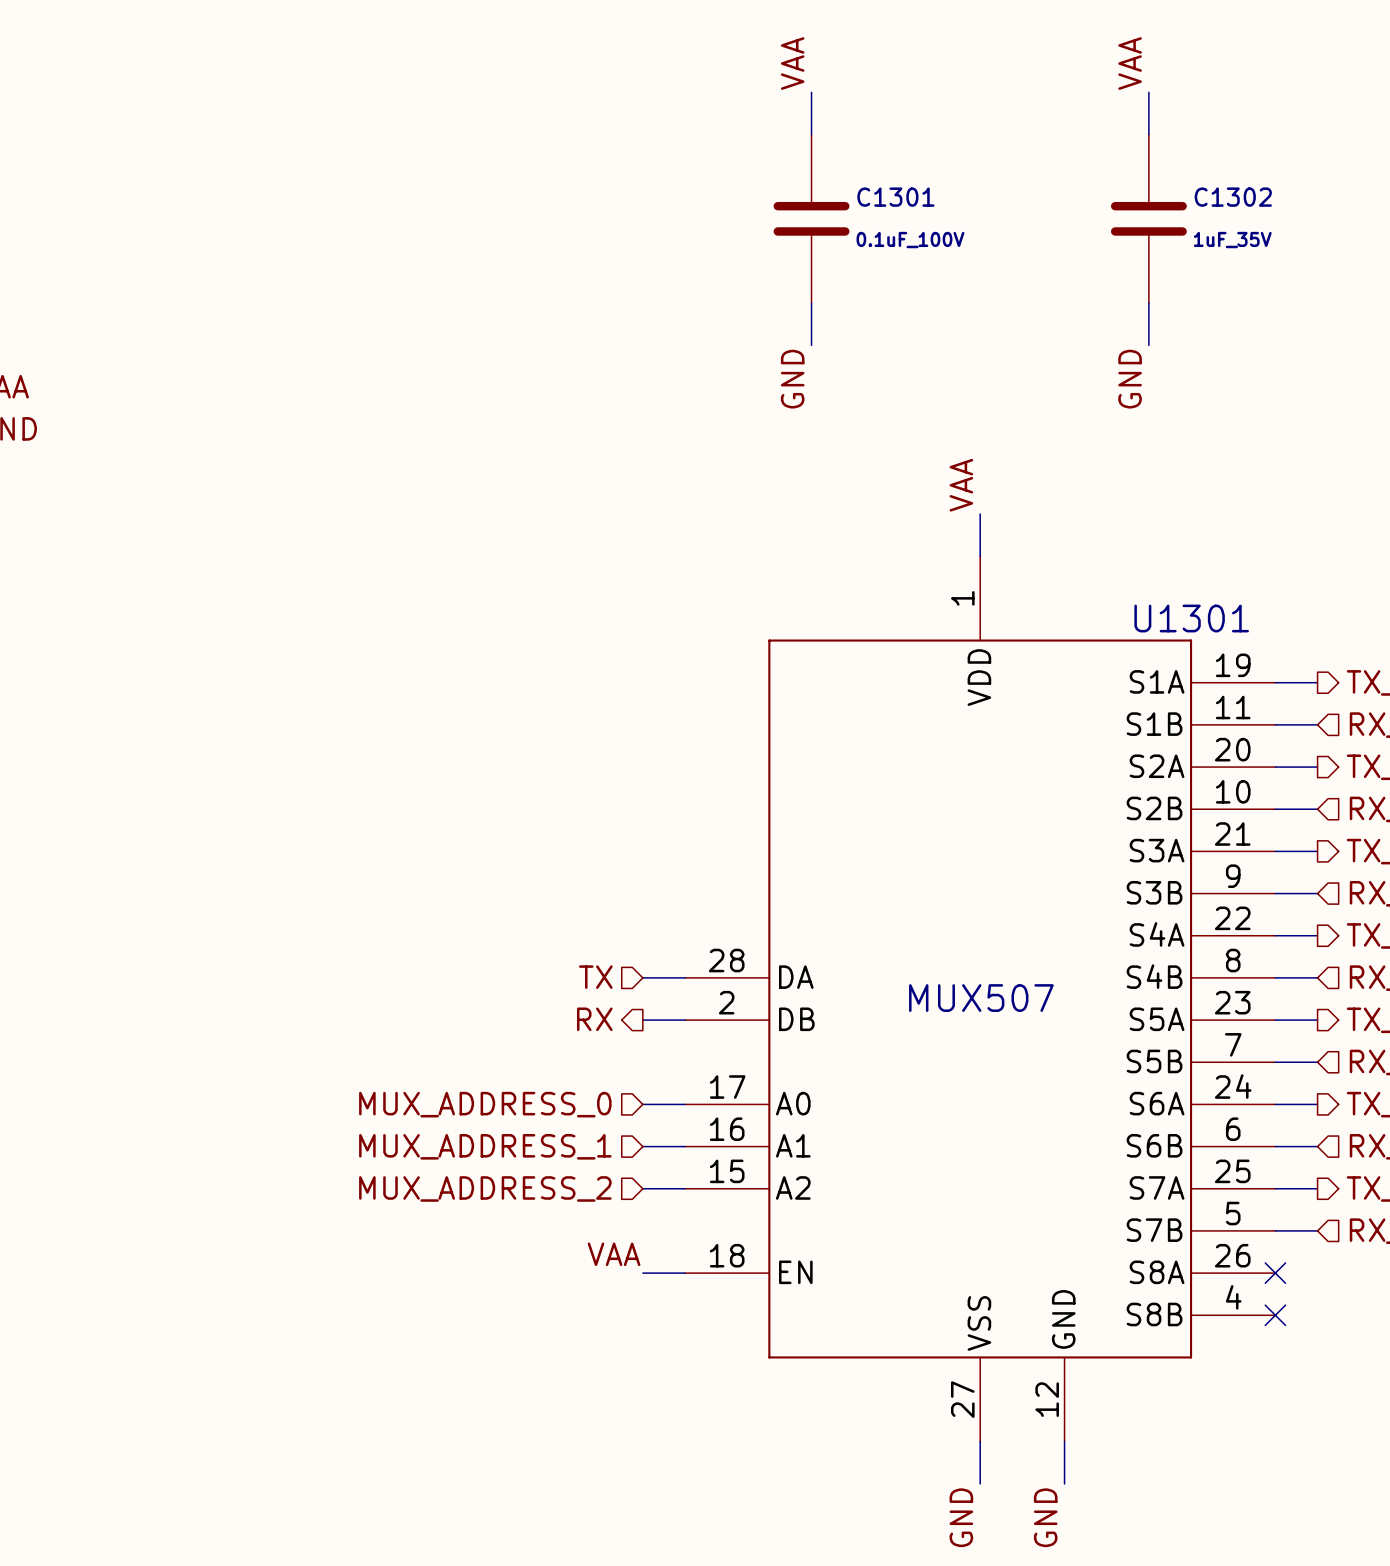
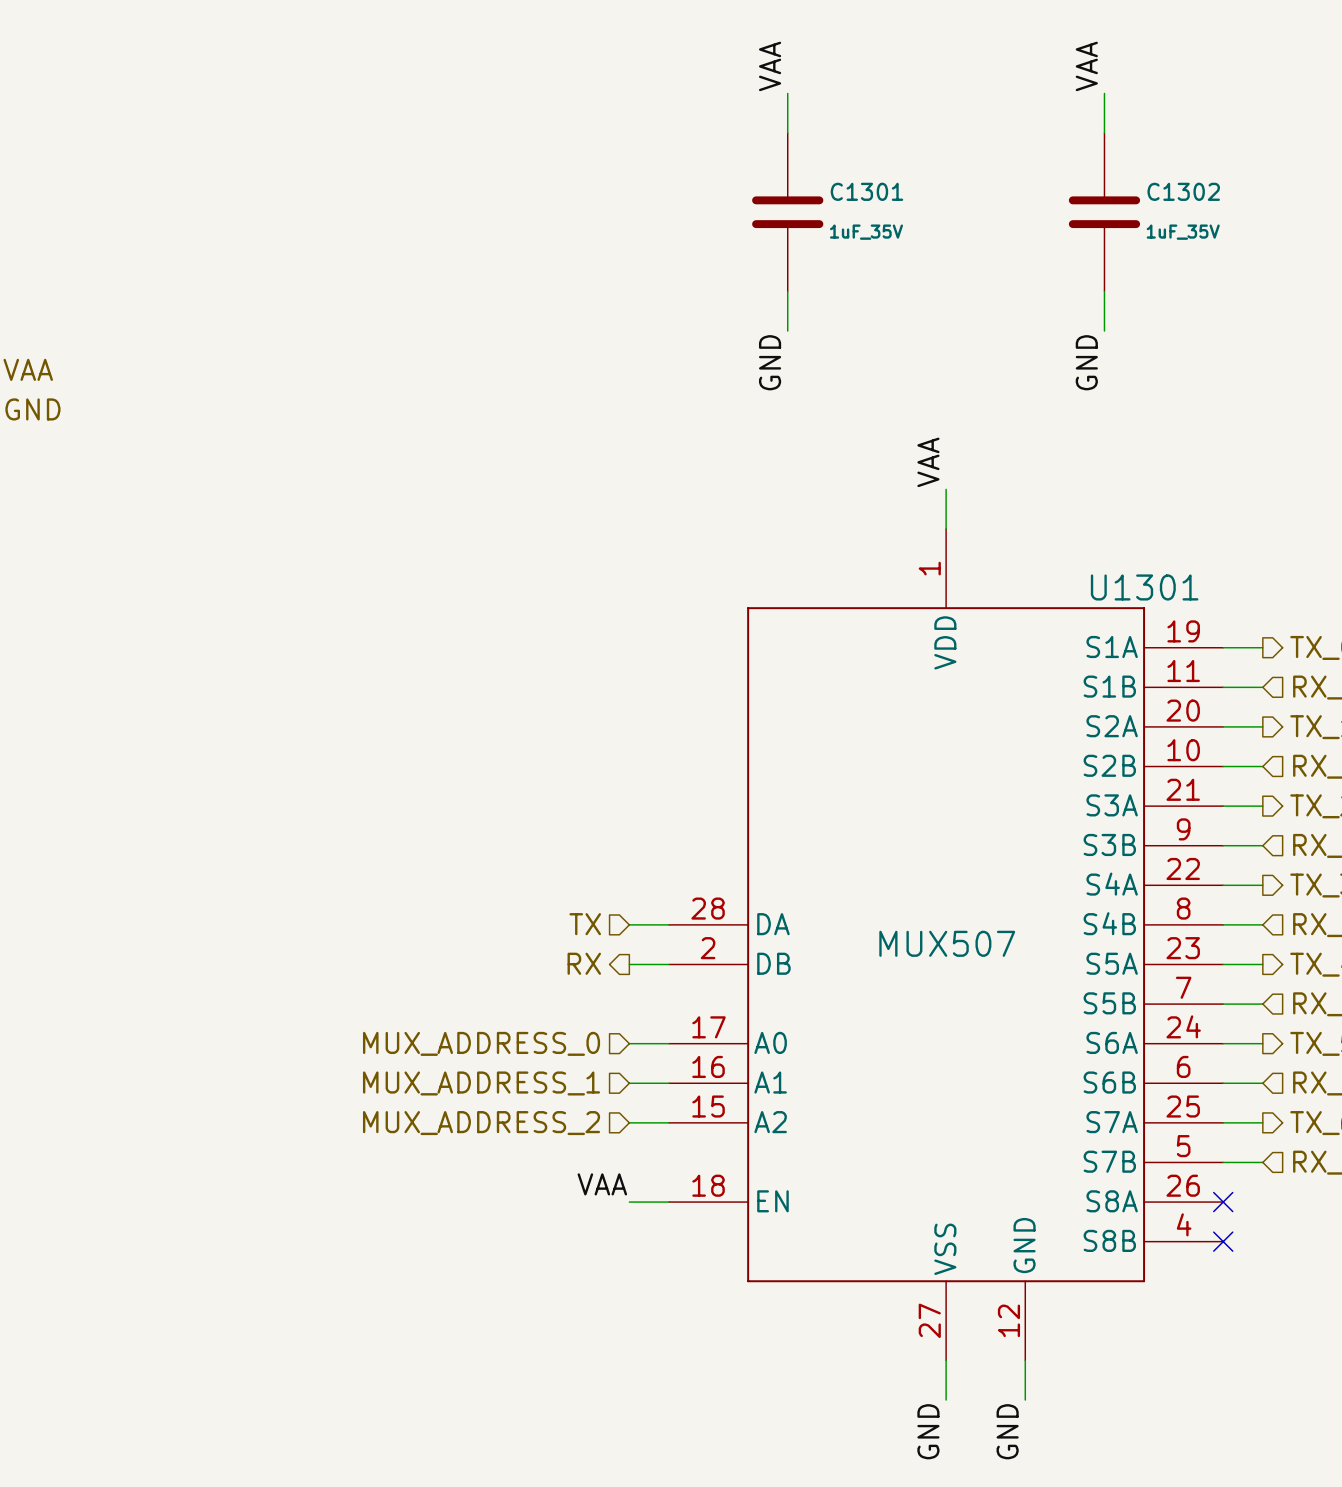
C1301 value: 0.1uF_100V (910, 240) -> 1uF_35V (866, 232)

